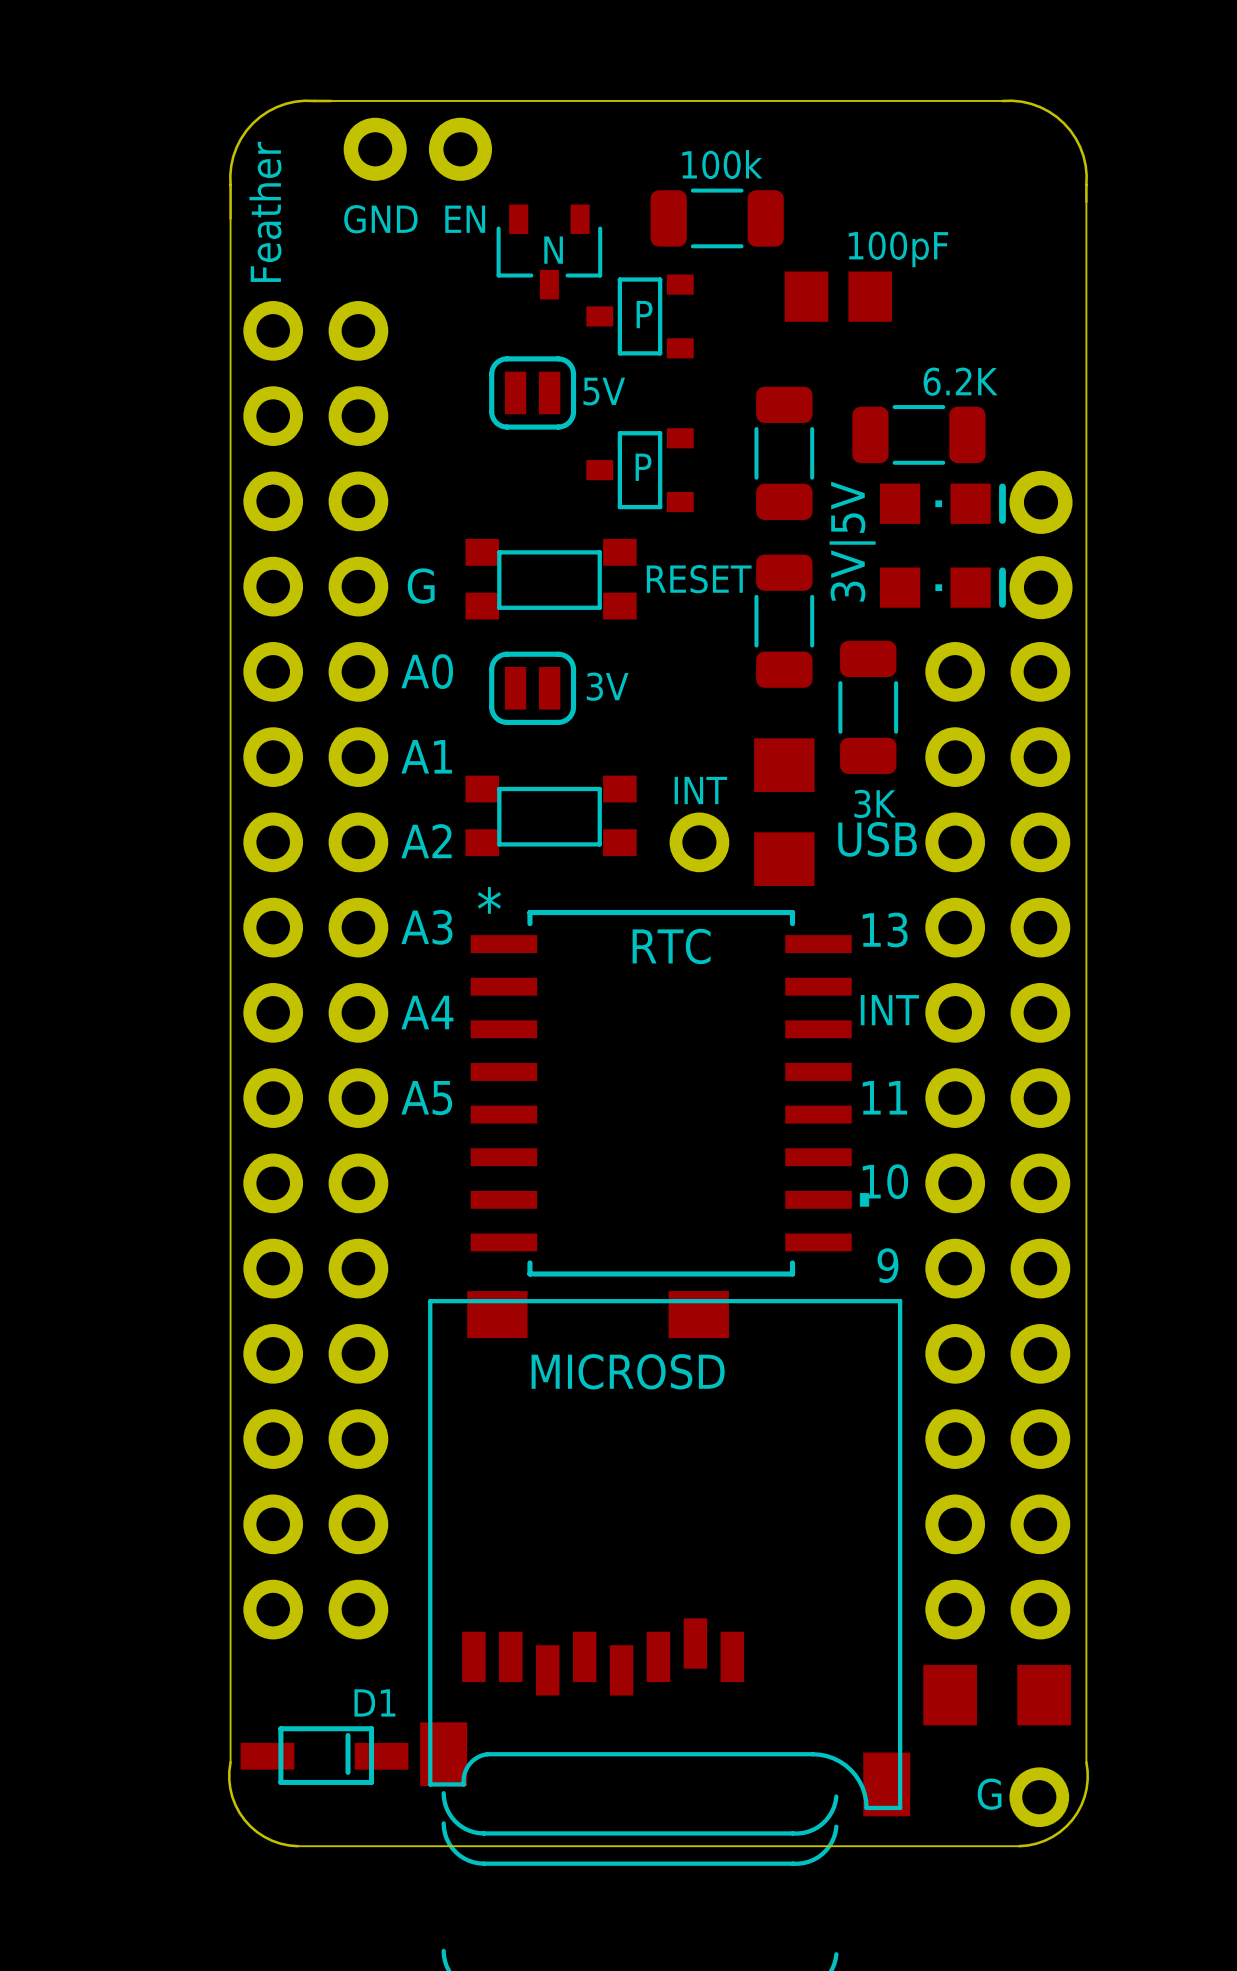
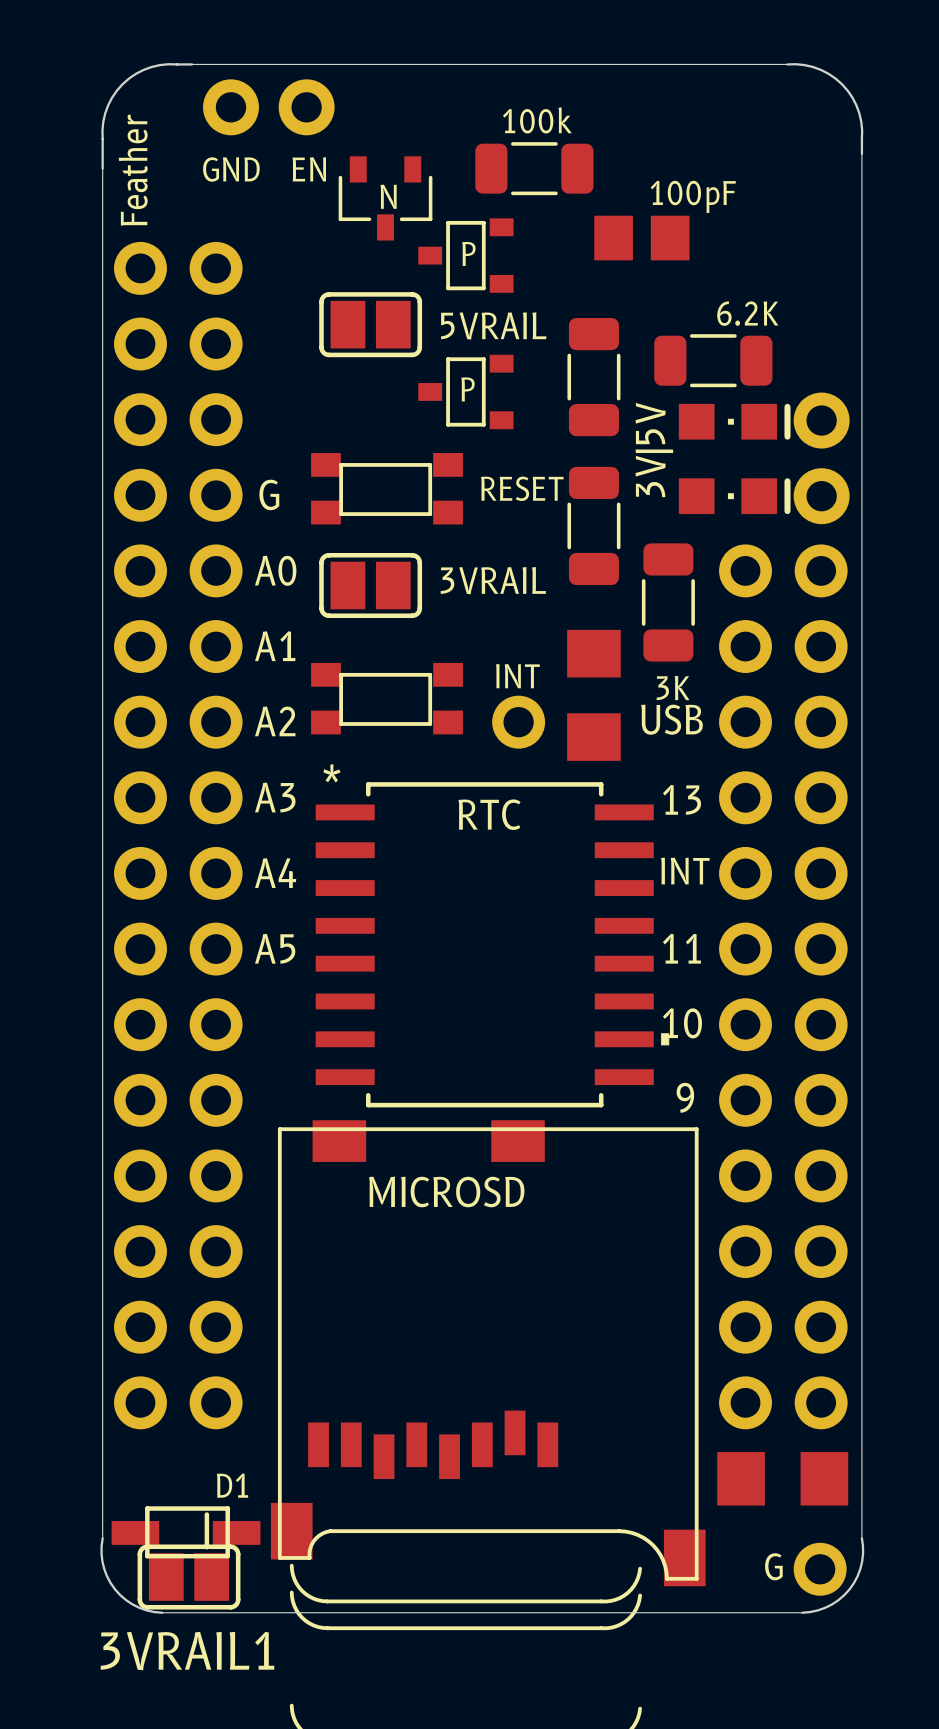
5V: (532, 392) -> none
5VRAIL: none -> (370, 324)
3V: (532, 688) -> none
3VRAIL: none -> (370, 585)
3VRAIL1: none -> (189, 1577)

